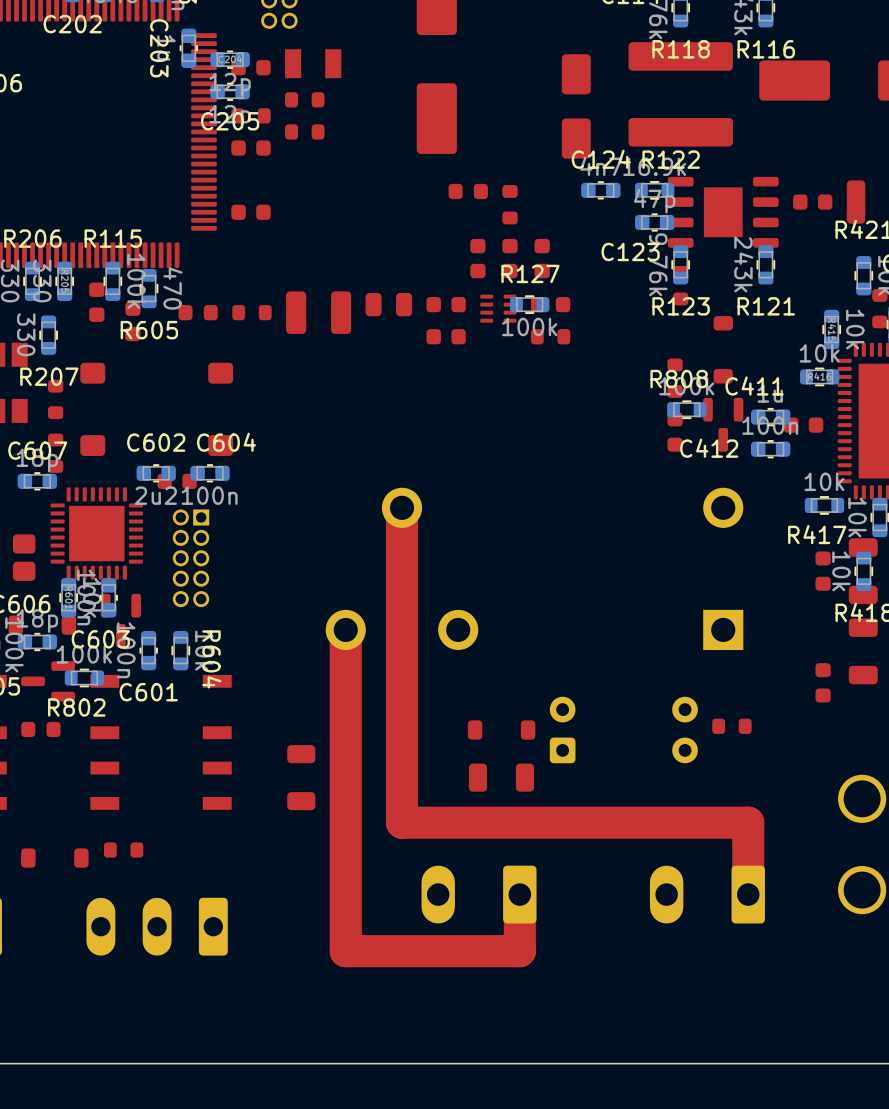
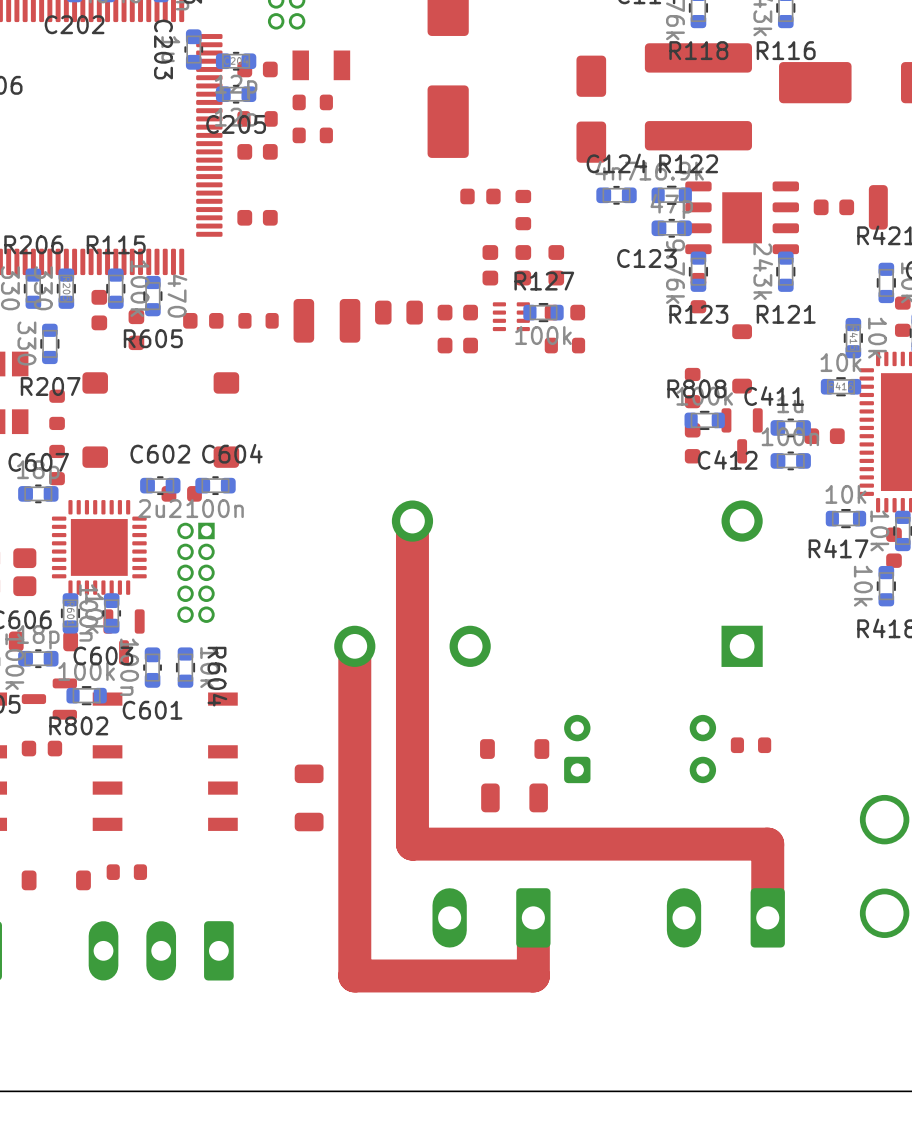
part position: (823, 571) -> (893, 547)
part: (863, 571) -> none
part: (863, 651) -> none
part: (823, 682) -> none

